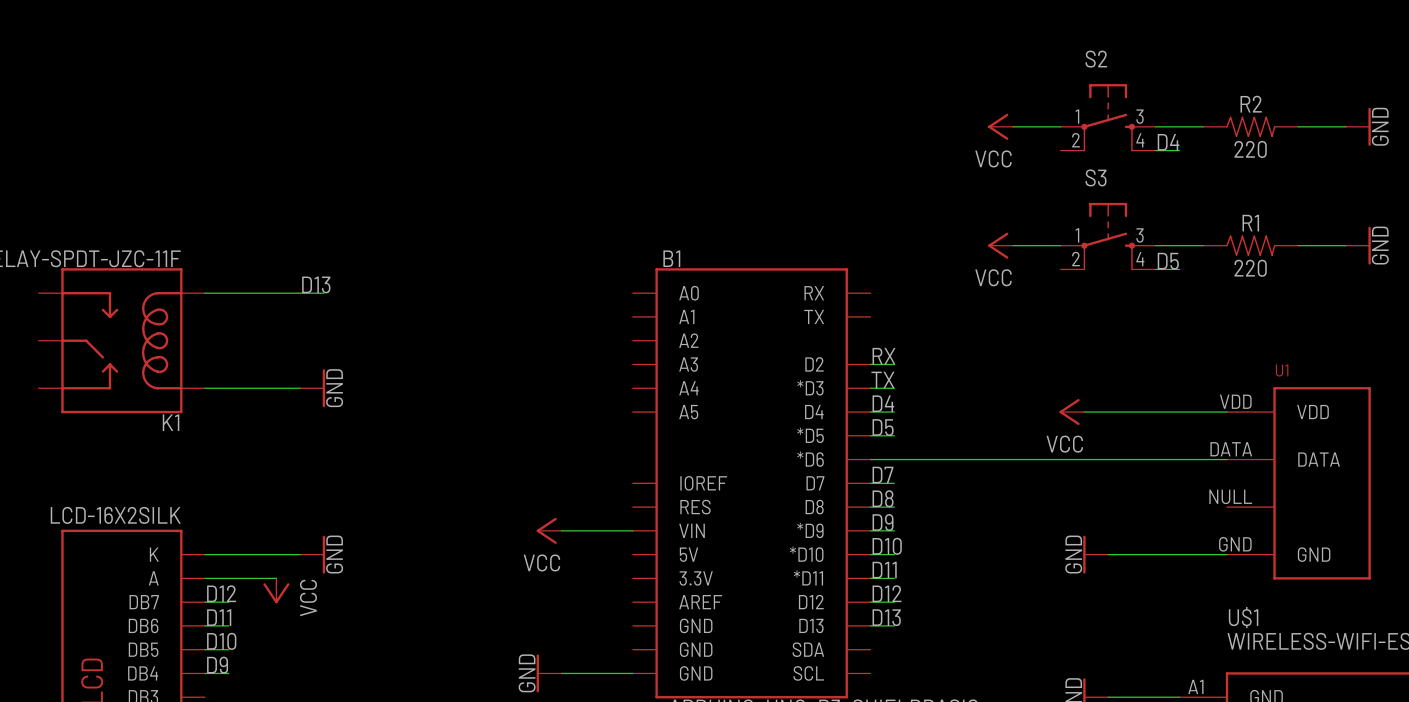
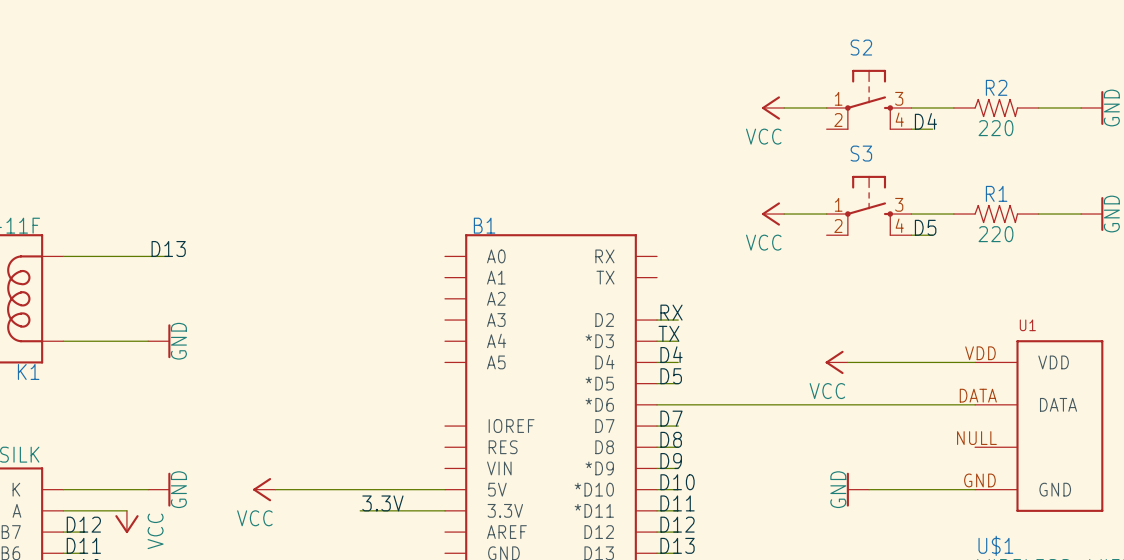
power symbol position: VCC (549, 530) -> VCC (264, 489)
wire: (561, 530) (632, 530) -> none
wire: none -> (275, 489) (445, 489)
label: none -> 3.3V (382, 503)
wire: none -> (360, 510) (445, 510)

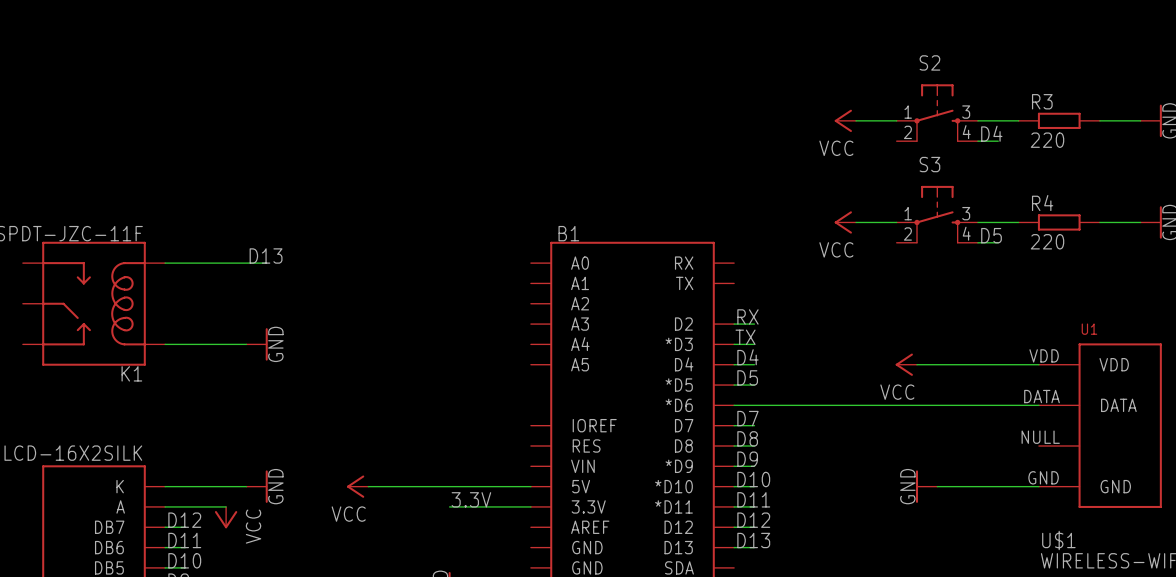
R2: 220 (996, 107) -> none
R3: none -> 220 (1059, 120)
R1: 220 (996, 214) -> none
R4: none -> 220 (1059, 222)

